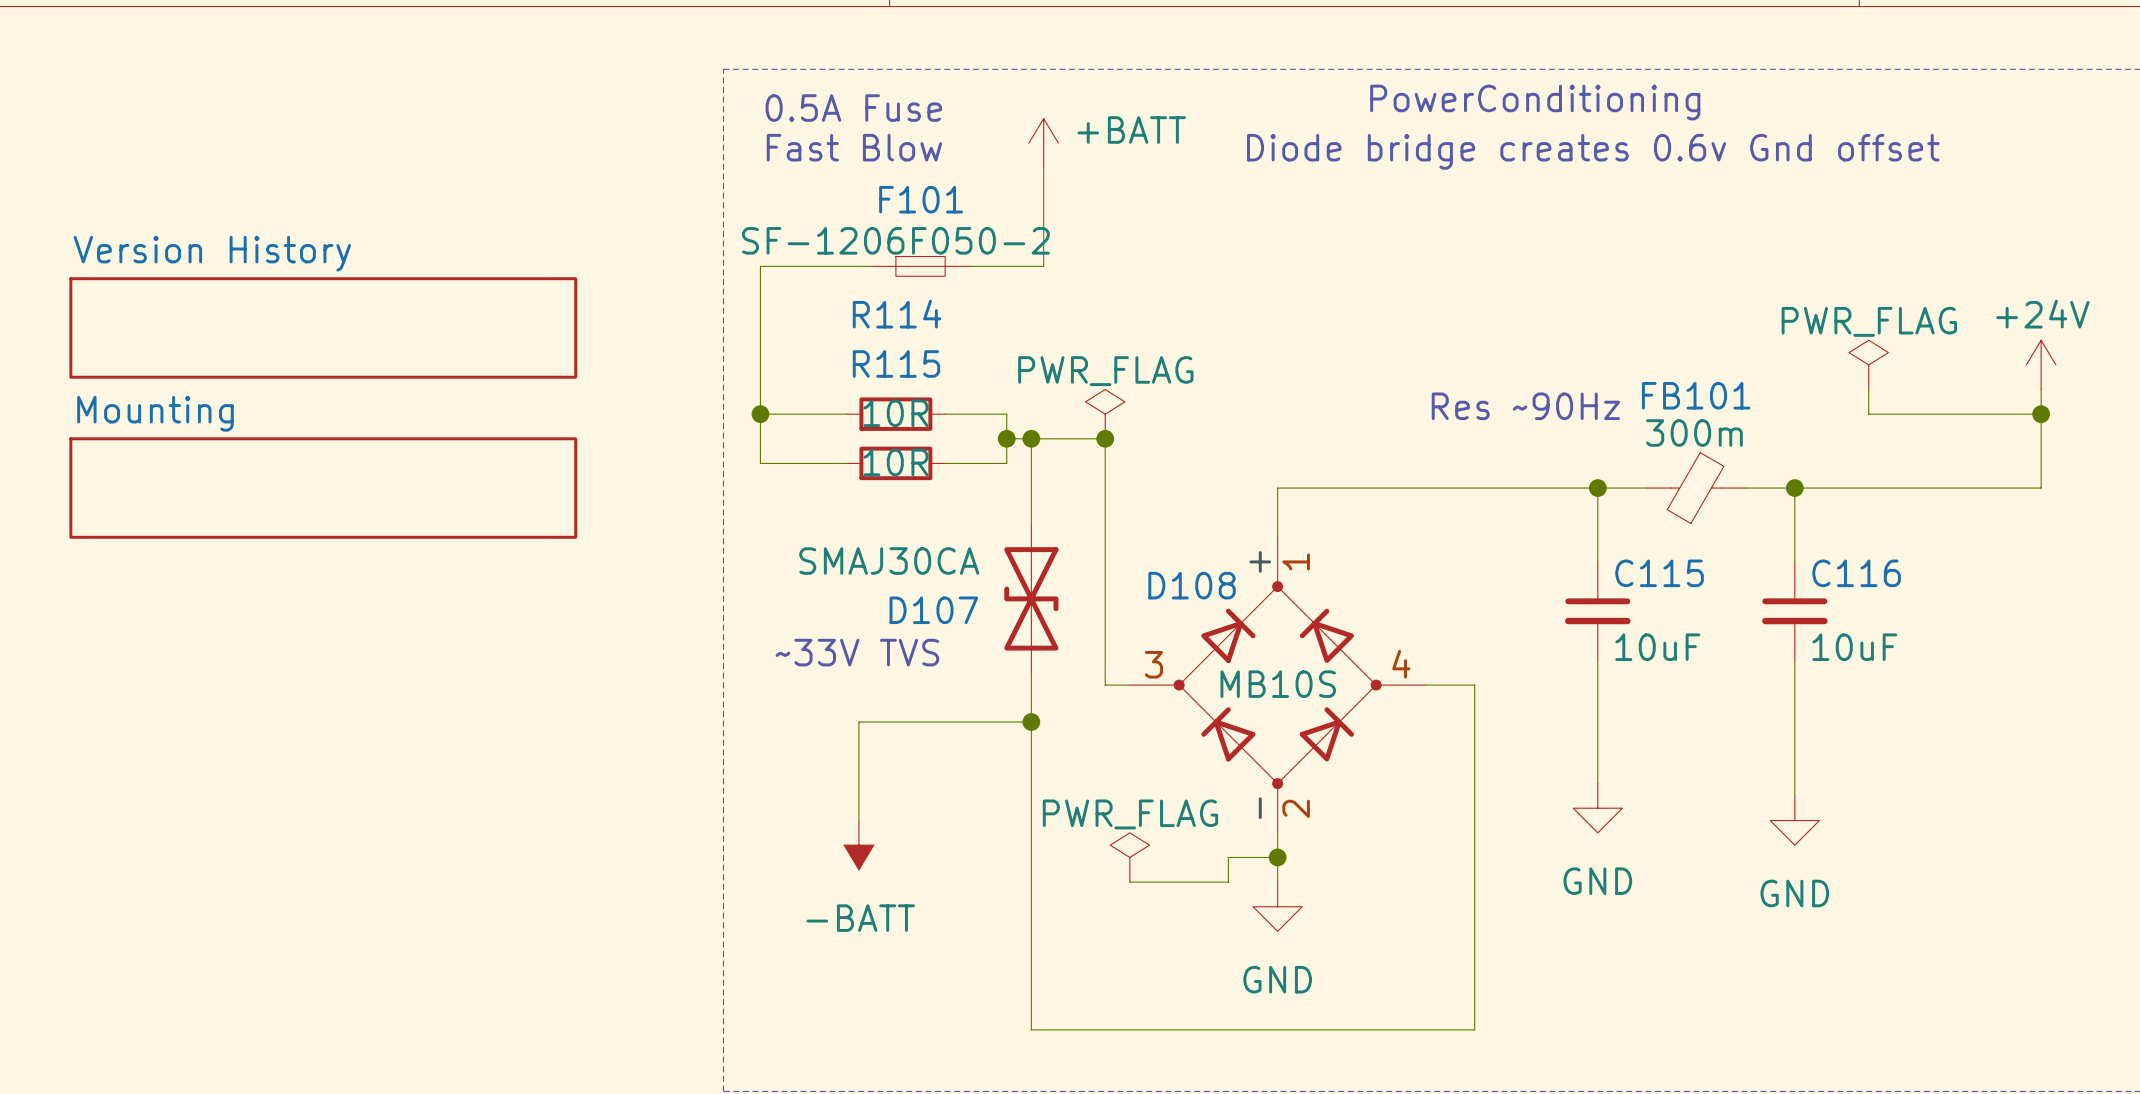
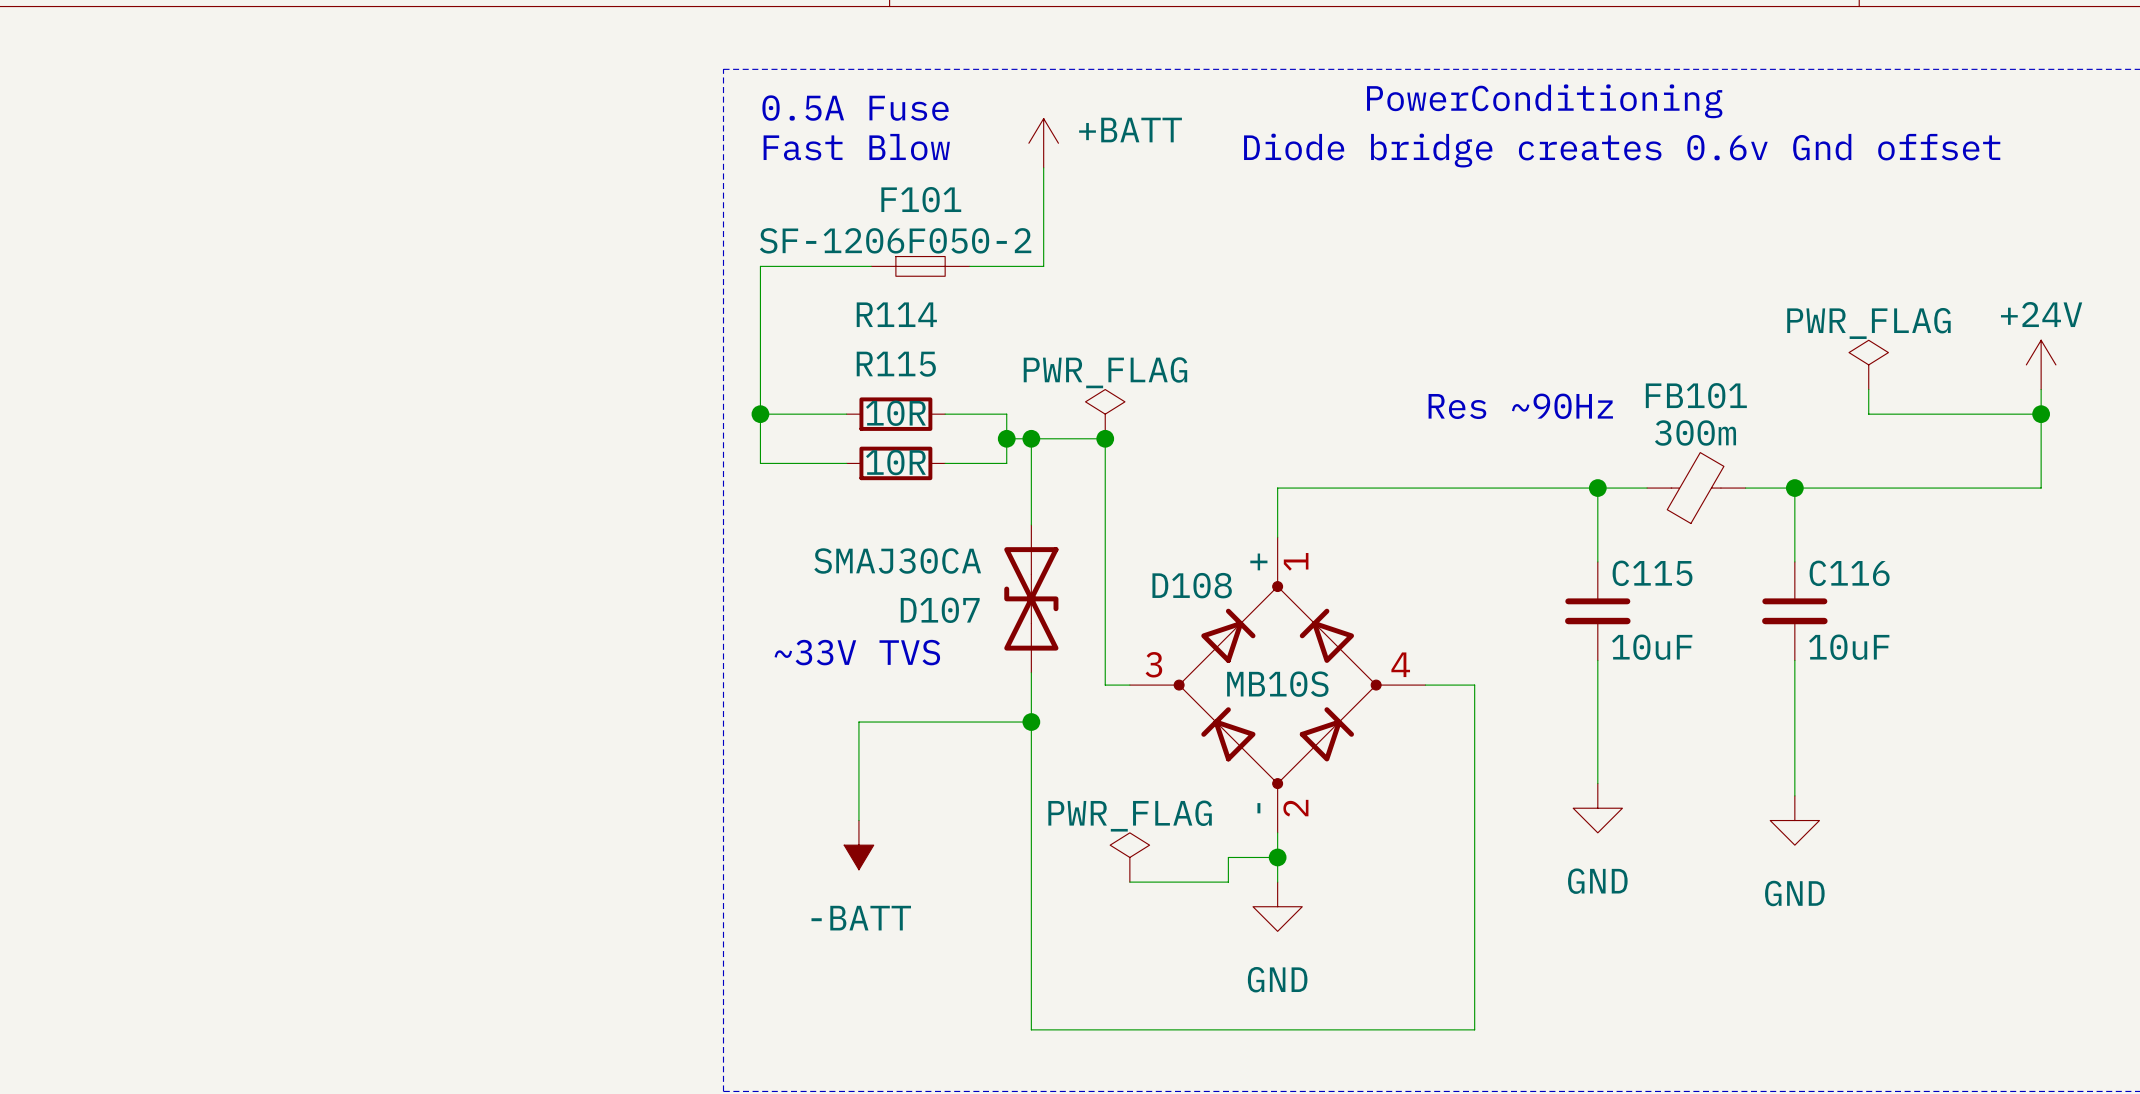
sheet Version History: (323, 327) -> none
sheet Mounting: (323, 488) -> none

